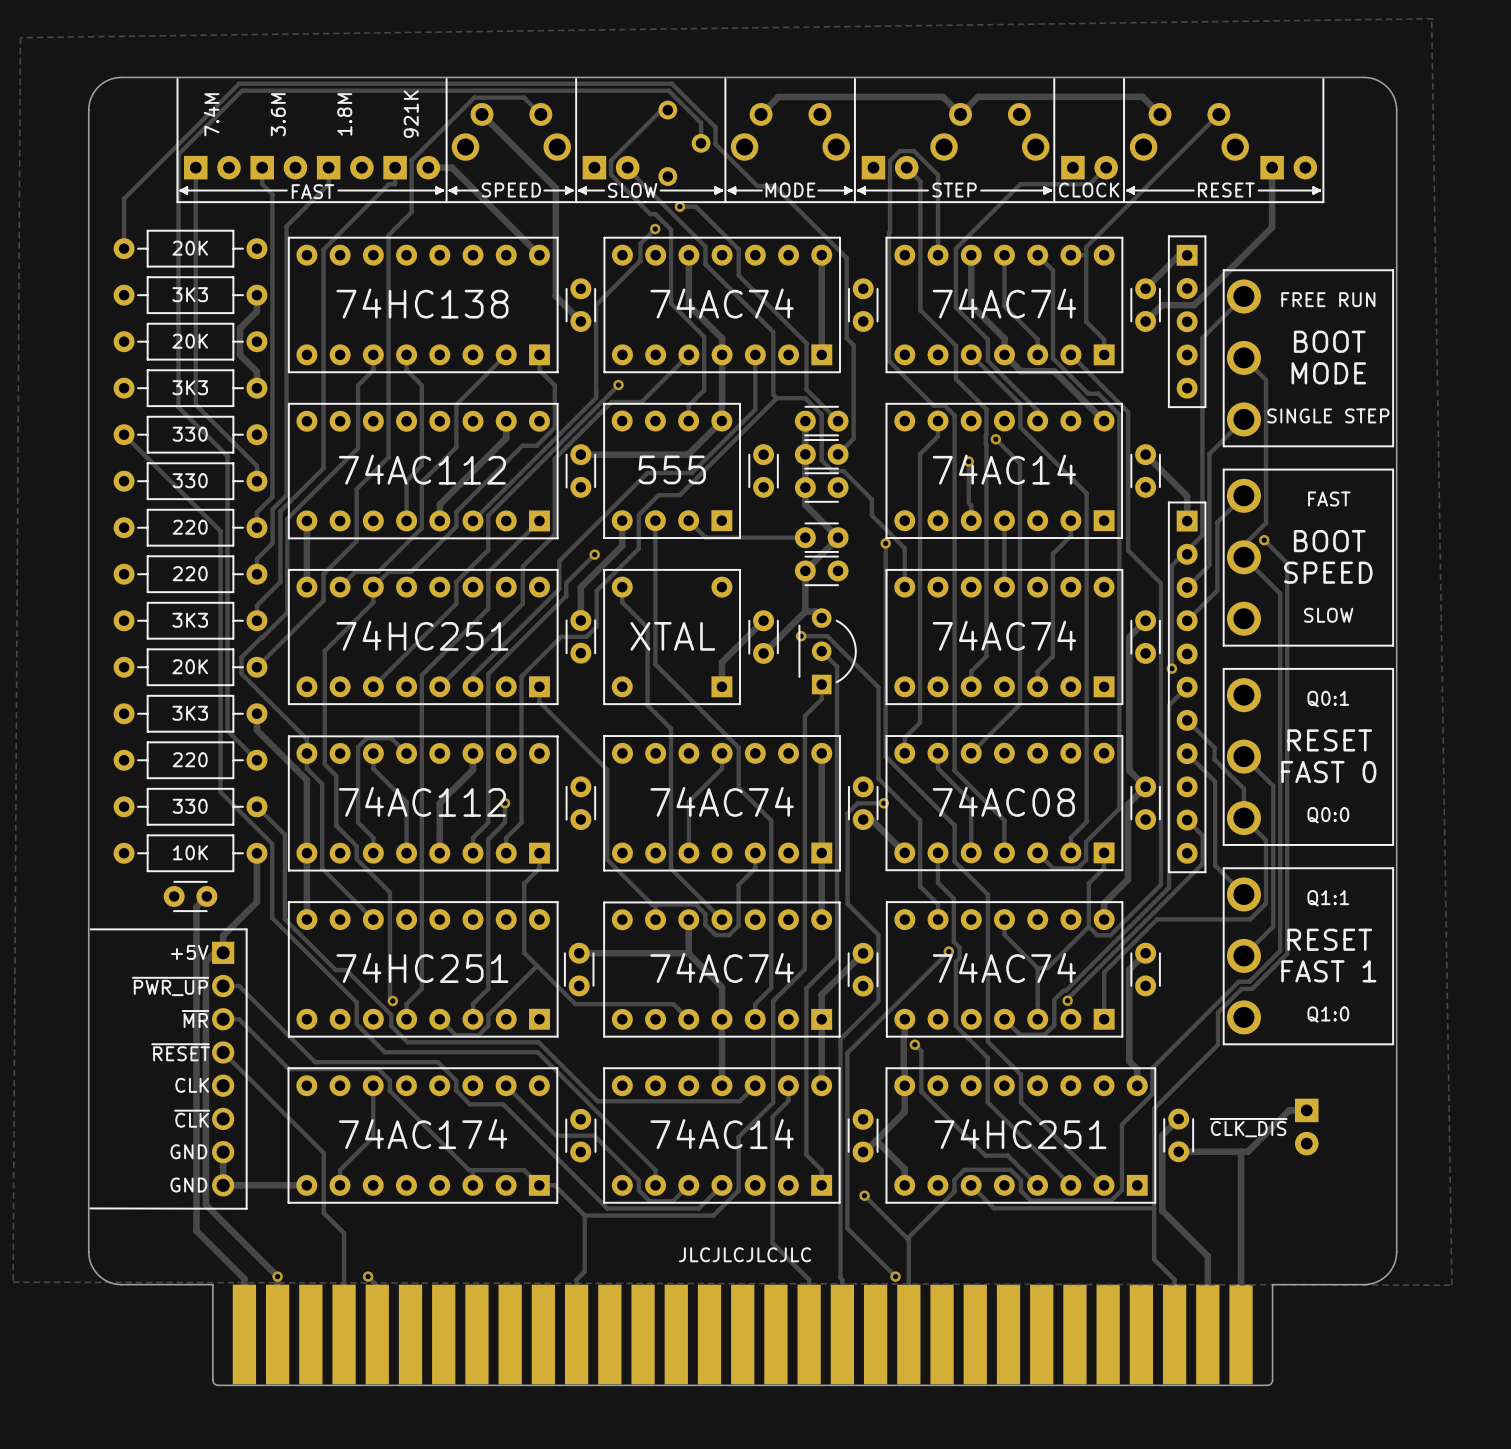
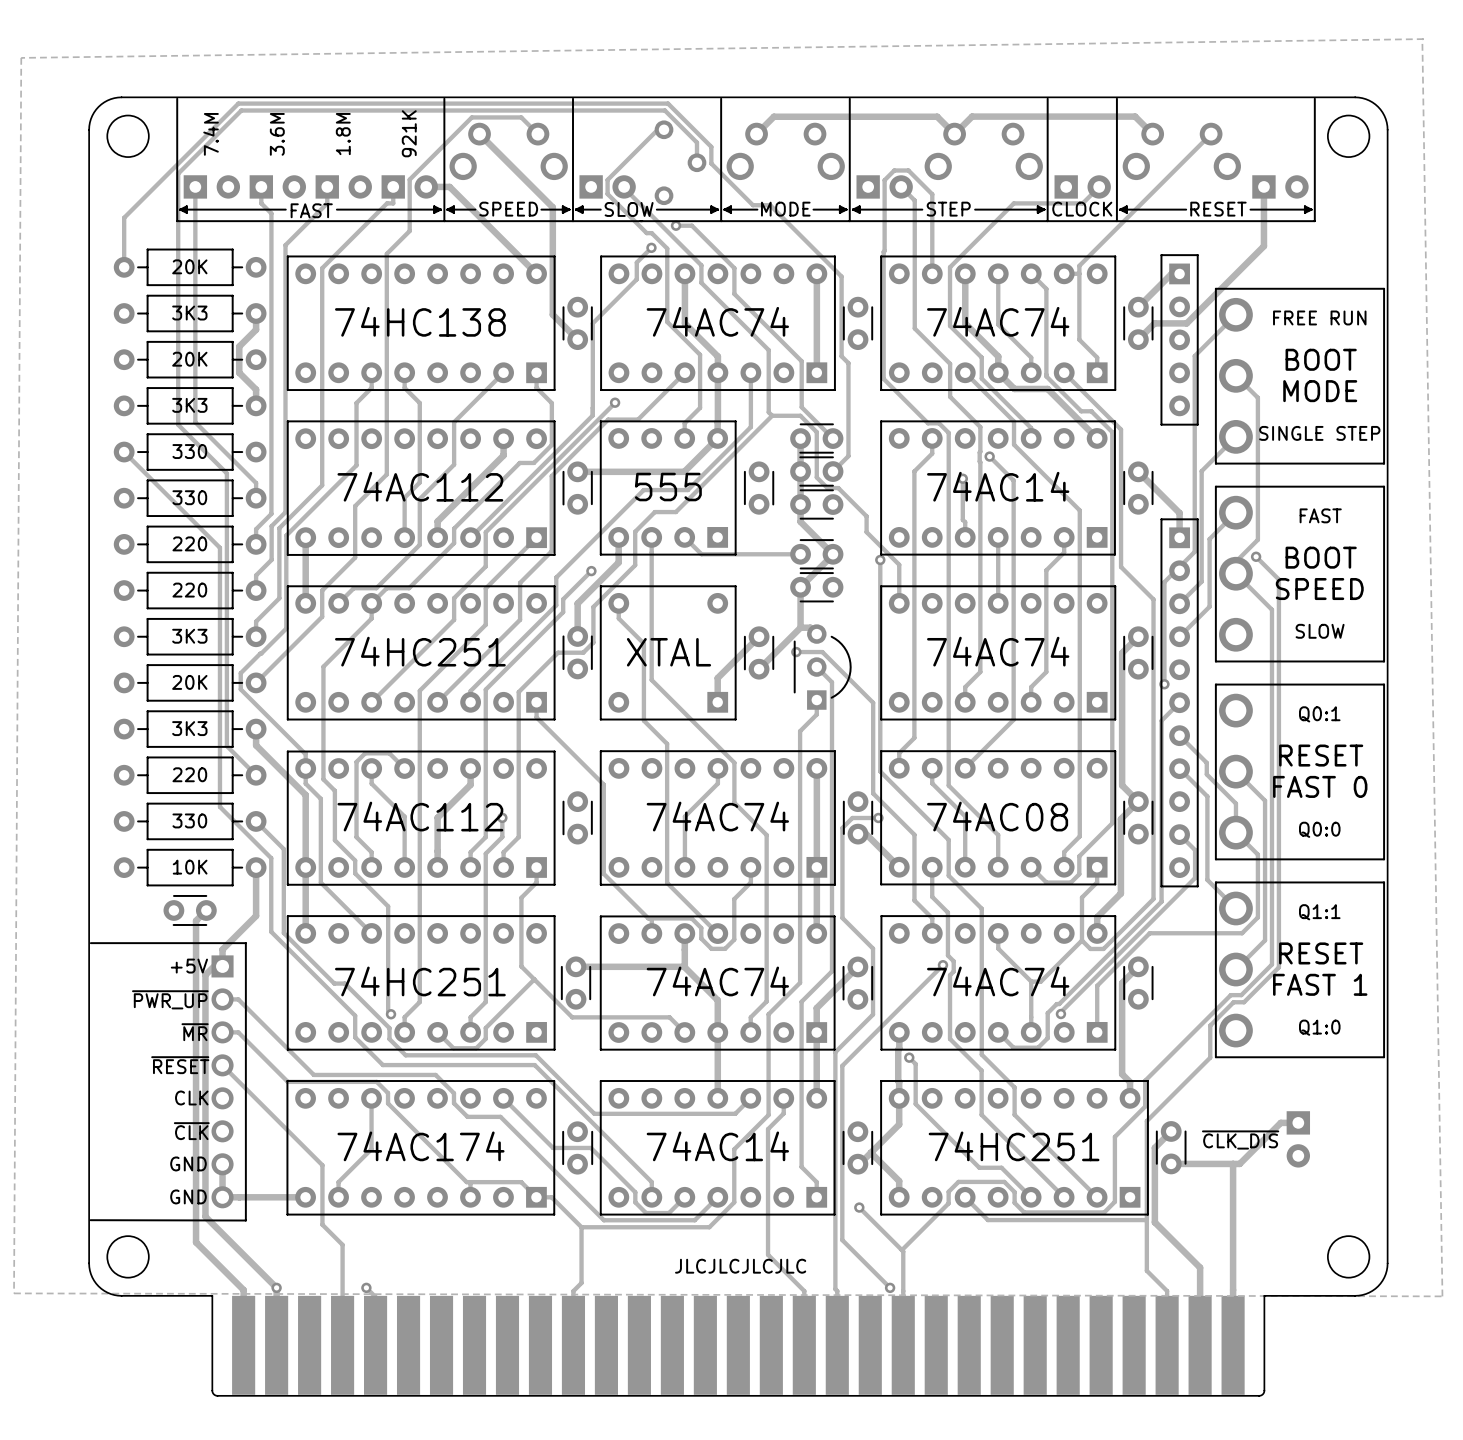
part footprint: [87, 76, 1398, 1387] -> [88, 96, 1389, 1397]

